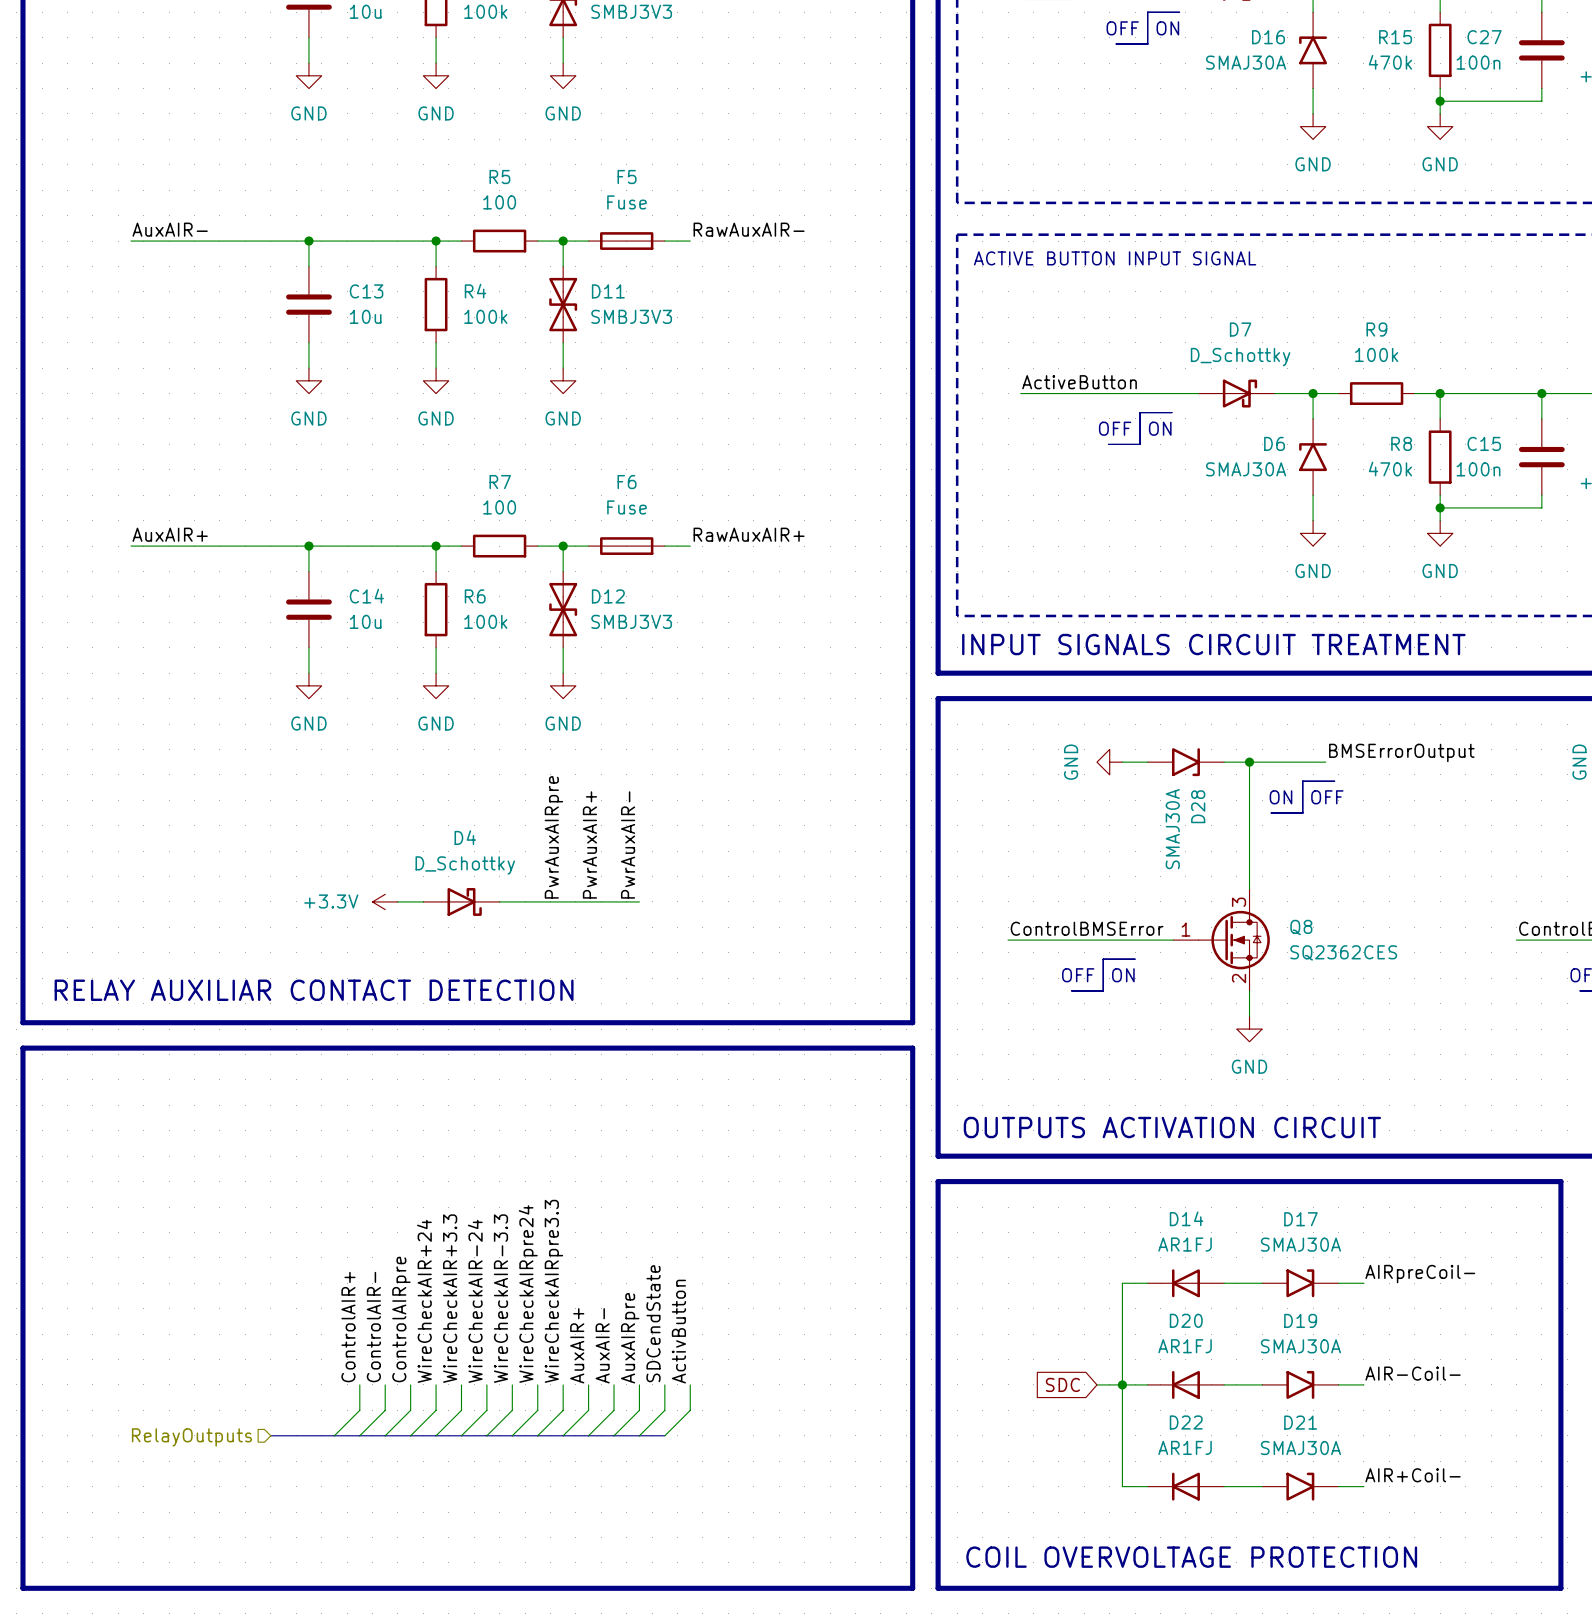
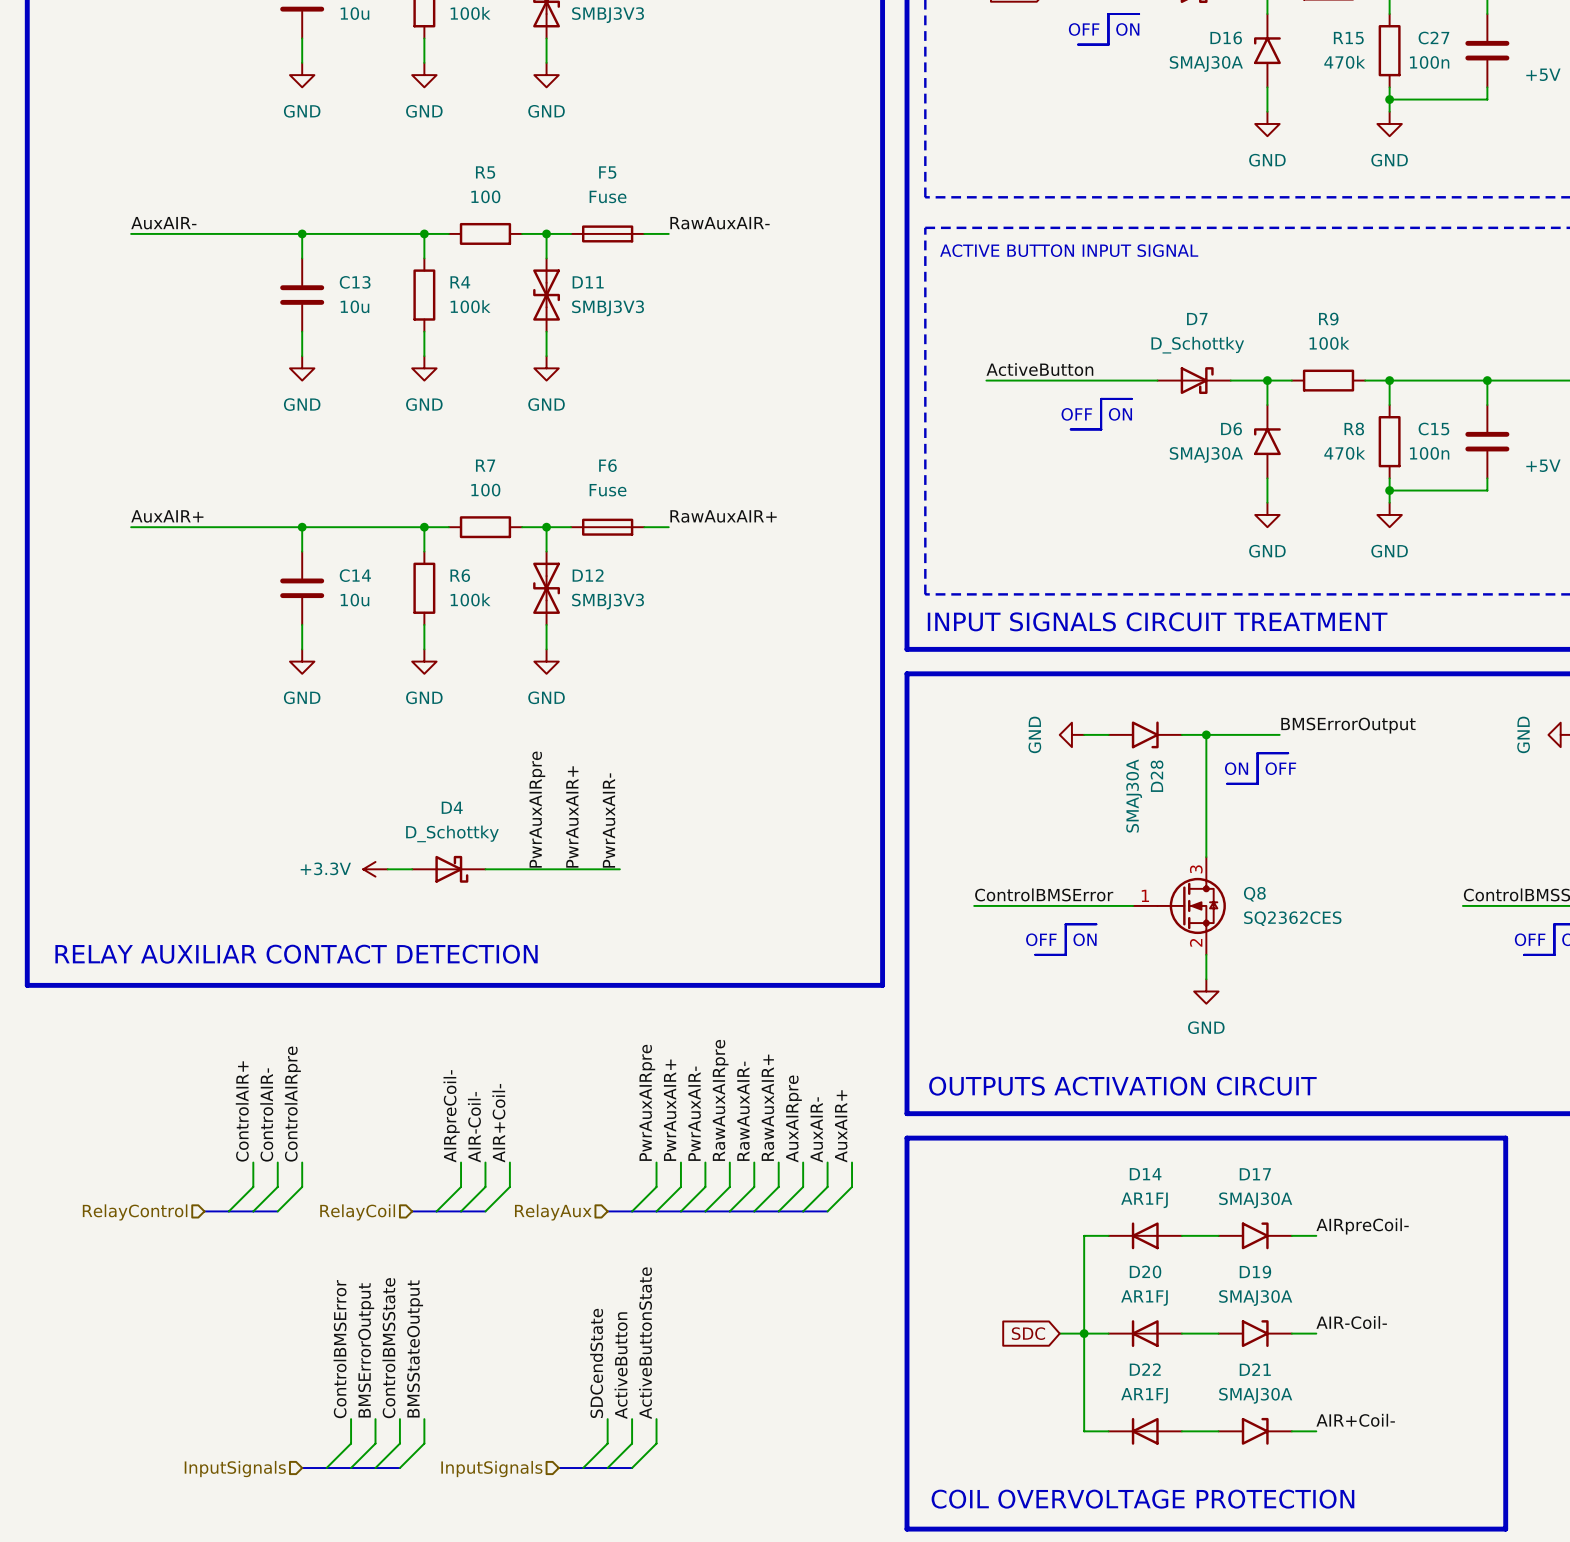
line: (22, 1048) (912, 1048) (912, 1588) (22, 1588) (22, 1048) -> none
label: none -> RawAuxAIRpre (720, 1100)
label: none -> PwrAuxAIRpre (647, 1102)
label: none -> RawAuxAIR- (743, 1111)
label: none -> RawAuxAIR+ (767, 1107)
label: none -> AIRpreCoil- (451, 1116)
label: none -> PwrAuxAIR+ (670, 1110)
label: none -> PwrAuxAIR- (694, 1113)
label: none -> AIR-Coil- (474, 1127)
label: none -> AIR+Coil- (498, 1123)
label: none -> AuxAIRpre (793, 1118)
label: none -> AuxAIR- (816, 1129)
label: none -> AuxAIR+ (841, 1126)
wire: none -> (253, 1162) (253, 1186) (228, 1211)
wire: none -> (277, 1162) (277, 1186) (253, 1211)
wire: none -> (302, 1162) (302, 1186) (277, 1211)
wire: none -> (803, 1162) (803, 1186) (778, 1211)
wire: none -> (827, 1162) (827, 1186) (803, 1211)
wire: none -> (852, 1162) (852, 1186) (827, 1211)
bus: none -> (204, 1211) (277, 1211)
bus: none -> (412, 1211) (485, 1211)
bus: none -> (607, 1211) (827, 1211)
hierarchical label: none -> RelayControl (135, 1212)
hierarchical label: none -> RelayCoil (357, 1212)
hierarchical label: none -> RelayAux (553, 1212)
label: WireCheckAIRpre3.3 (553, 1291) -> none
label: WireCheckAIRpre24 (528, 1294) -> none
label: WireCheckAIR+3.3 (450, 1298) -> none
label: WireCheckAIR-3.3 (500, 1298) -> none
label: WireCheckAIR+24 (424, 1301) -> none
label: WireCheckAIR-24 (475, 1301) -> none
label position: ControlAIRpre (401, 1319) -> ControlAIRpre (292, 1104)
label position: SDCendState (653, 1323) -> SDCendState (596, 1363)
label position: ControlAIR+ (348, 1327) -> ControlAIR+ (242, 1111)
label position: ControlAIR- (373, 1327) -> ControlAIR- (266, 1114)
label: ActivButton (678, 1331) -> ActiveButtonState (645, 1343)
label: AuxAIRpre (630, 1338) -> none
label: AuxAIR+ (577, 1345) -> none
label: AuxAIR- (602, 1345) -> none
wire: (359, 1384) (359, 1410) (334, 1435) -> (461, 1162) (461, 1186) (436, 1211)
wire: (385, 1384) (385, 1410) (359, 1435) -> (485, 1162) (485, 1186) (461, 1211)
wire: (410, 1384) (410, 1410) (385, 1435) -> (509, 1162) (509, 1186) (485, 1211)
wire: (436, 1384) (436, 1410) (410, 1435) -> (424, 1419) (424, 1443) (399, 1468)
wire: (461, 1384) (461, 1410) (436, 1435) -> (399, 1419) (399, 1443) (375, 1468)
wire: (486, 1384) (486, 1410) (461, 1435) -> (375, 1419) (375, 1443) (351, 1468)
wire: (512, 1384) (512, 1410) (486, 1435) -> (351, 1419) (351, 1443) (326, 1468)
wire: (537, 1384) (537, 1410) (512, 1435) -> (607, 1419) (607, 1443) (583, 1468)
wire: (563, 1384) (563, 1410) (537, 1435) -> (656, 1162) (656, 1186) (632, 1211)
wire: (588, 1384) (588, 1410) (563, 1435) -> (680, 1162) (680, 1186) (656, 1211)
wire: (614, 1384) (614, 1410) (588, 1435) -> (705, 1162) (705, 1186) (680, 1211)
wire: (639, 1384) (639, 1410) (614, 1435) -> (729, 1162) (729, 1186) (705, 1211)
wire: (664, 1384) (664, 1410) (639, 1435) -> (754, 1162) (754, 1186) (729, 1211)
wire: (690, 1384) (690, 1410) (664, 1435) -> (778, 1162) (778, 1186) (754, 1211)
label: none -> ControlBMSError (340, 1349)
label: none -> ControlBMSState (388, 1348)
label: none -> BMSStateOutput (415, 1348)
label: none -> BMSErrorOutput (366, 1350)
label: none -> ActiveButton (621, 1365)
bus: (270, 1435) (664, 1435) -> none
hierarchical label: RelayOutputs (191, 1437) -> none
wire: none -> (632, 1419) (632, 1443) (607, 1468)
wire: none -> (656, 1419) (656, 1443) (632, 1468)
bus: none -> (302, 1468) (399, 1468)
bus: none -> (558, 1468) (632, 1468)
hierarchical label: none -> InputSignals (235, 1469)
hierarchical label: none -> InputSignals (491, 1469)

